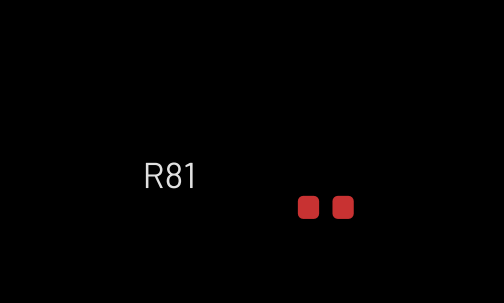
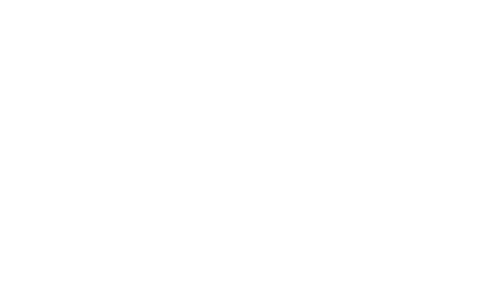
R81: (325, 207) -> none

